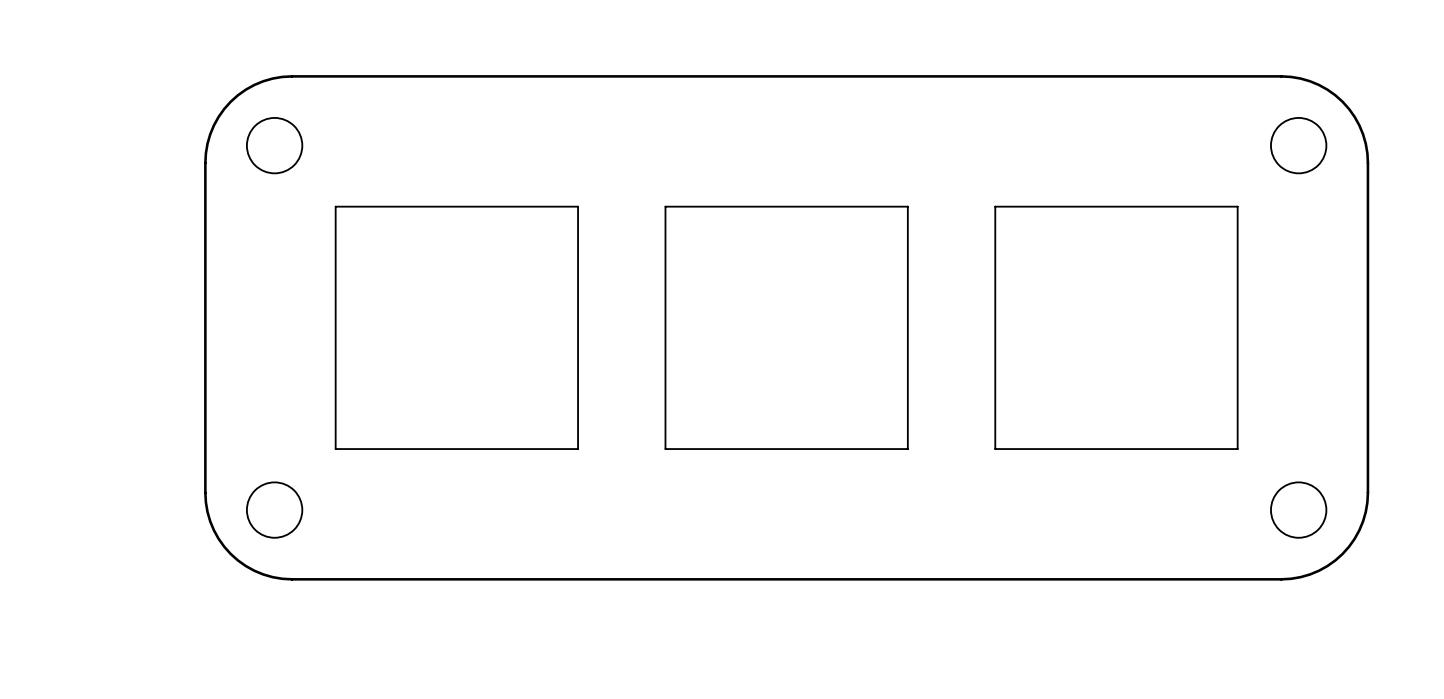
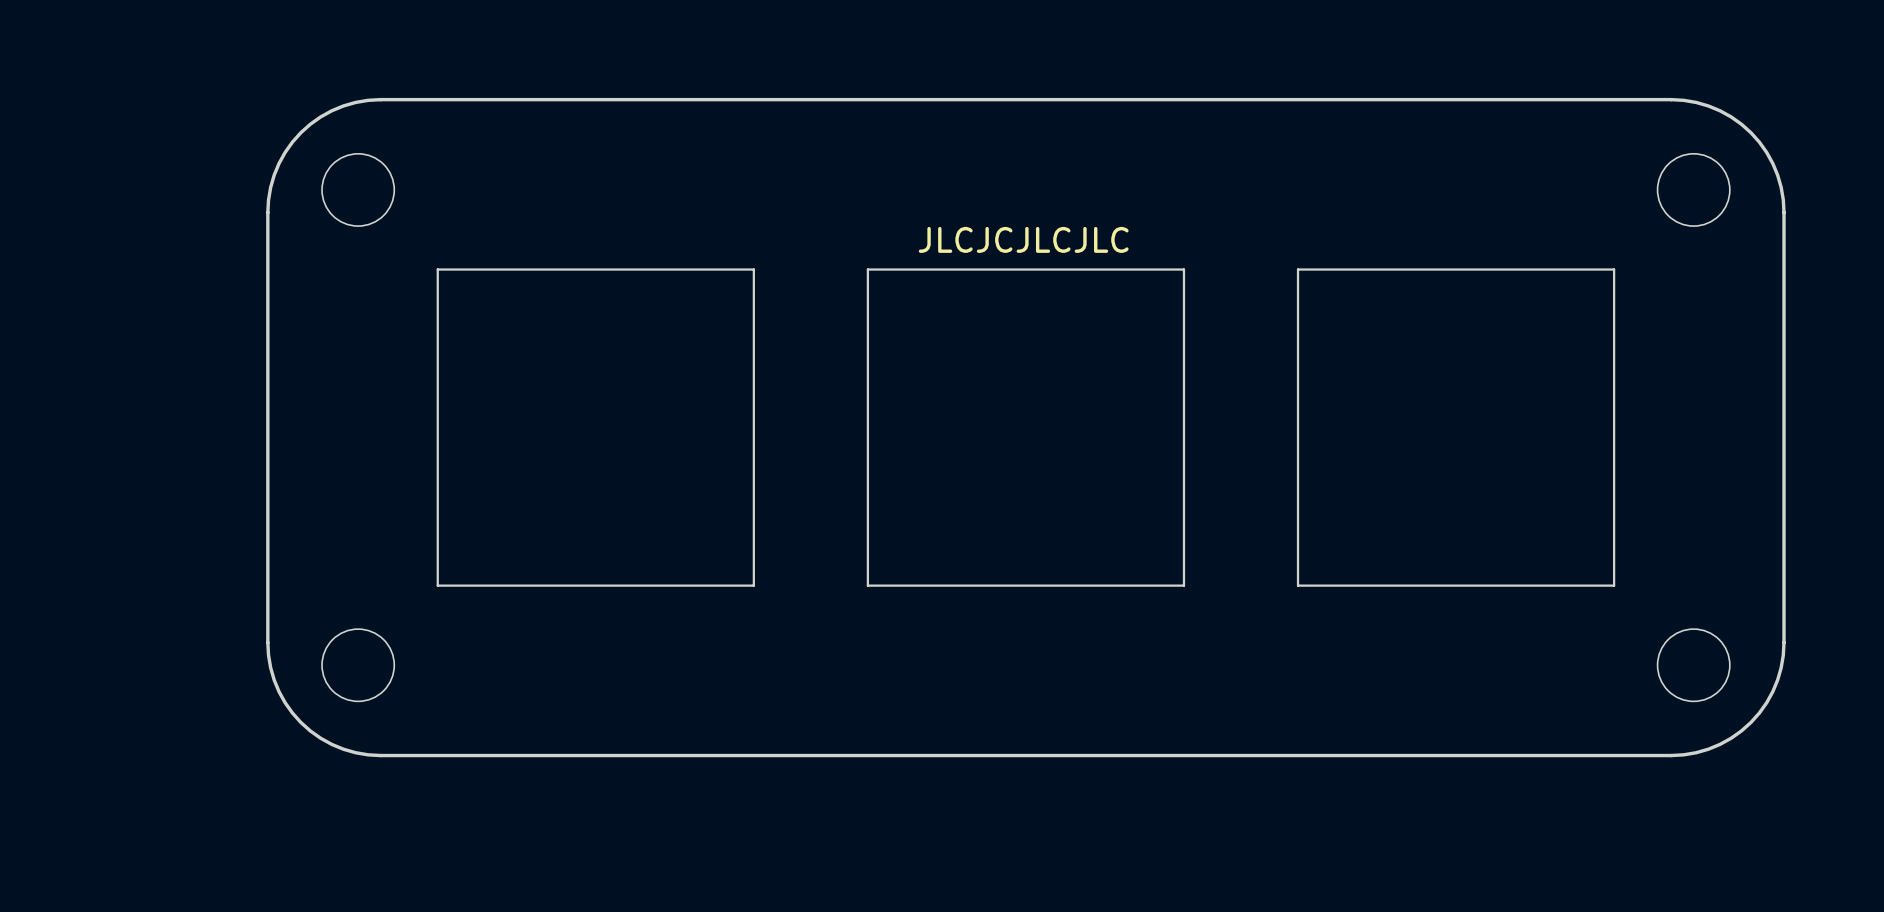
text: none -> JLCJCJLCJLC (1023, 239)

